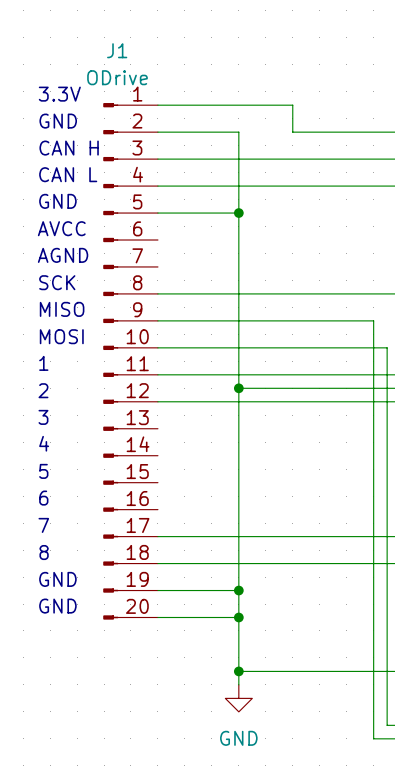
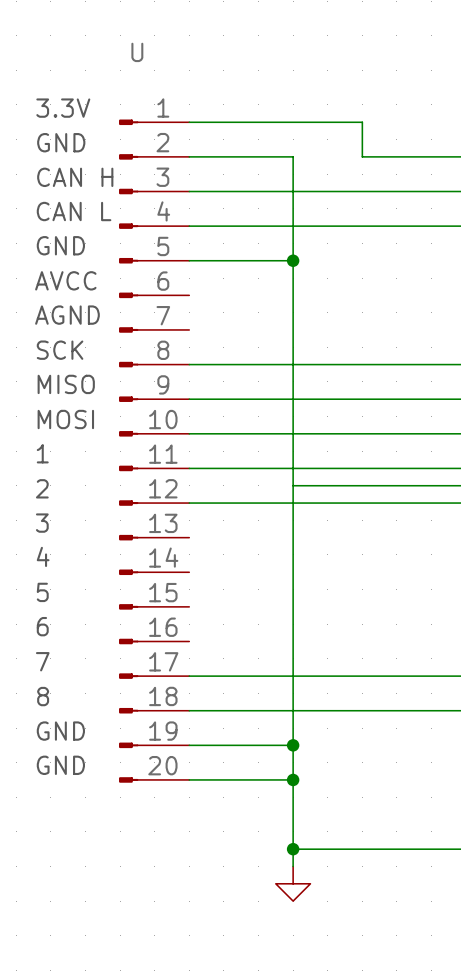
J1 name: J1 (117, 50) -> U (137, 52)
J1 value: ODrive (117, 77) -> none
junction: (238, 388) -> none
power symbol text: GND (238, 738) -> none

